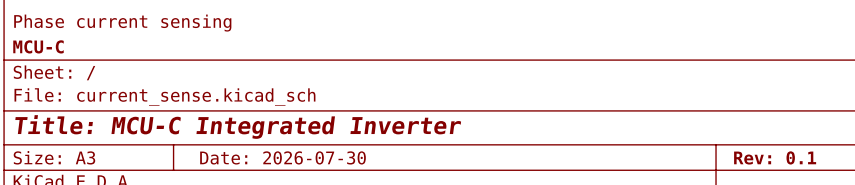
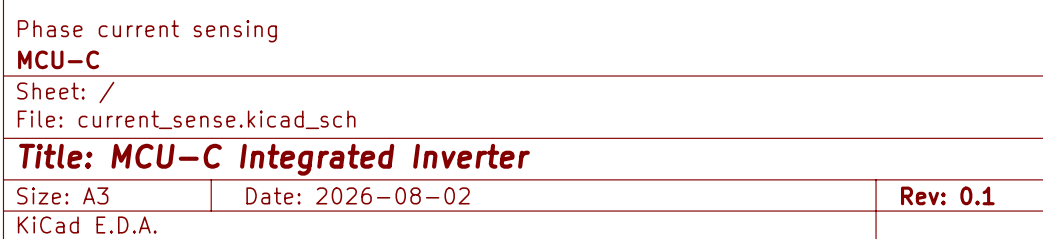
title block: Date: 2026-07-30 (283, 157) -> Date: 2026-08-02 (358, 195)

